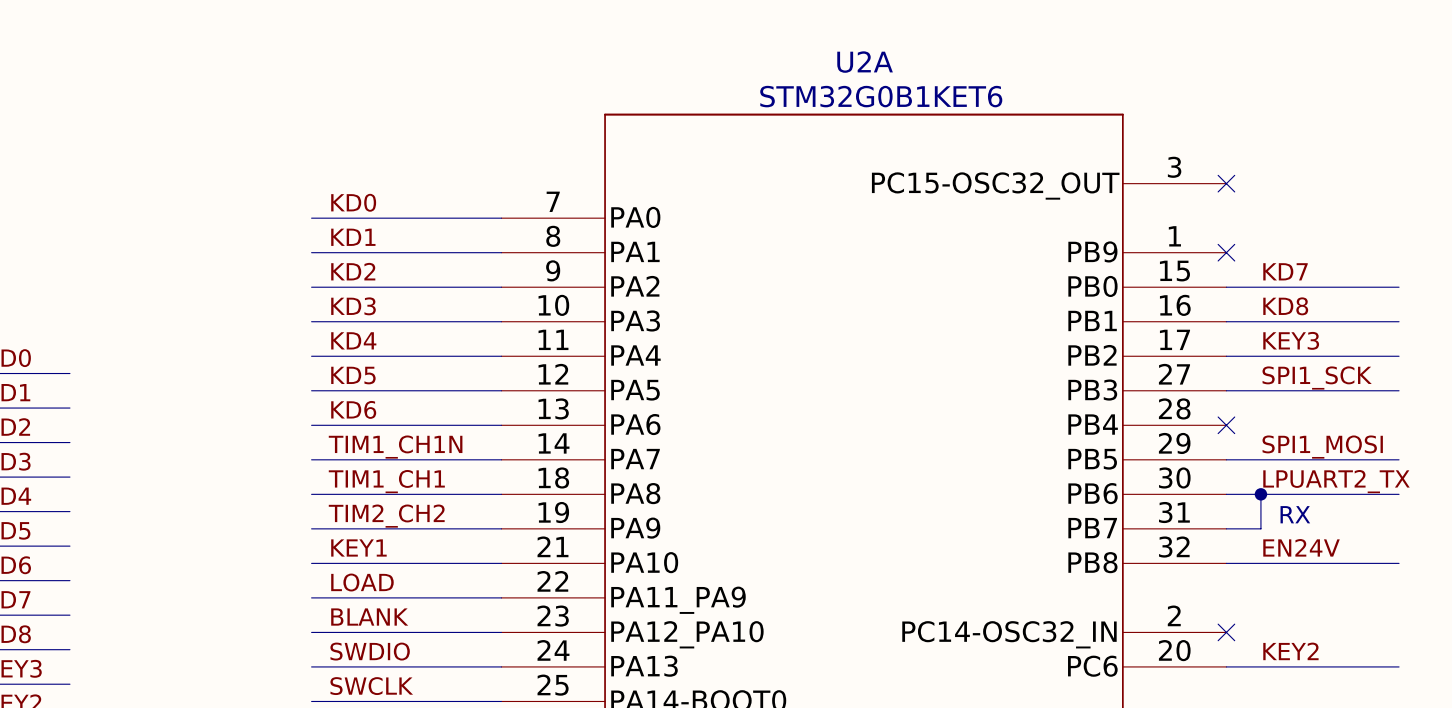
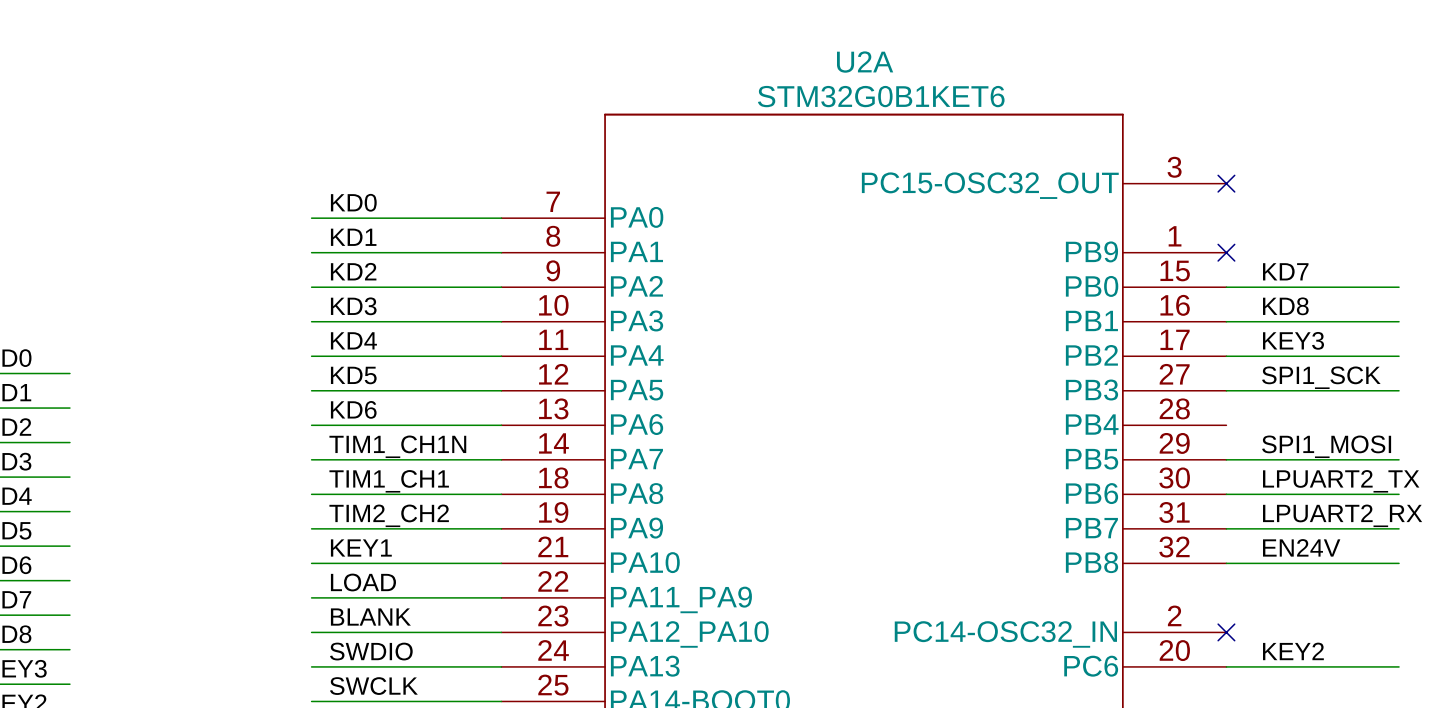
no-connect mark: (1226, 425) -> none
wire: (1260, 494) (1260, 528) -> (1399, 528) (1260, 528)
junction: (1260, 494) -> none
text: RX (1295, 514) -> none
label: none -> LPUART2_RX (1342, 515)

